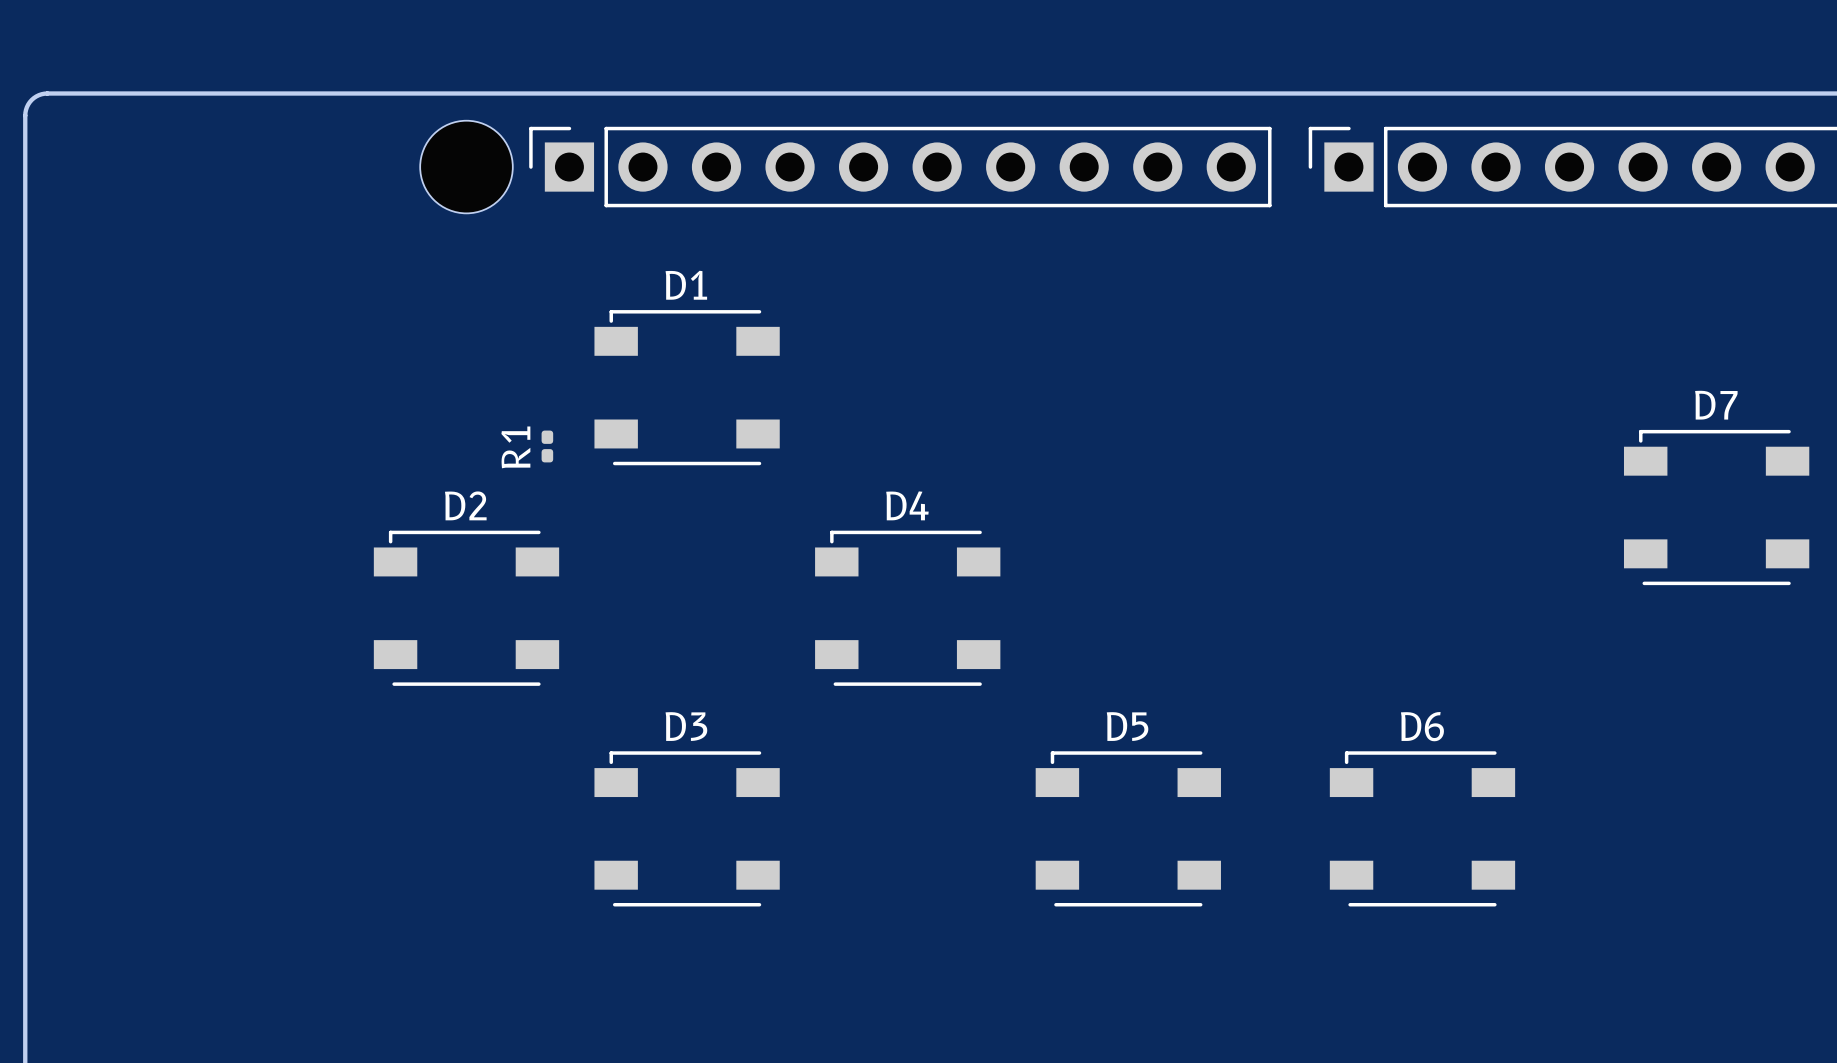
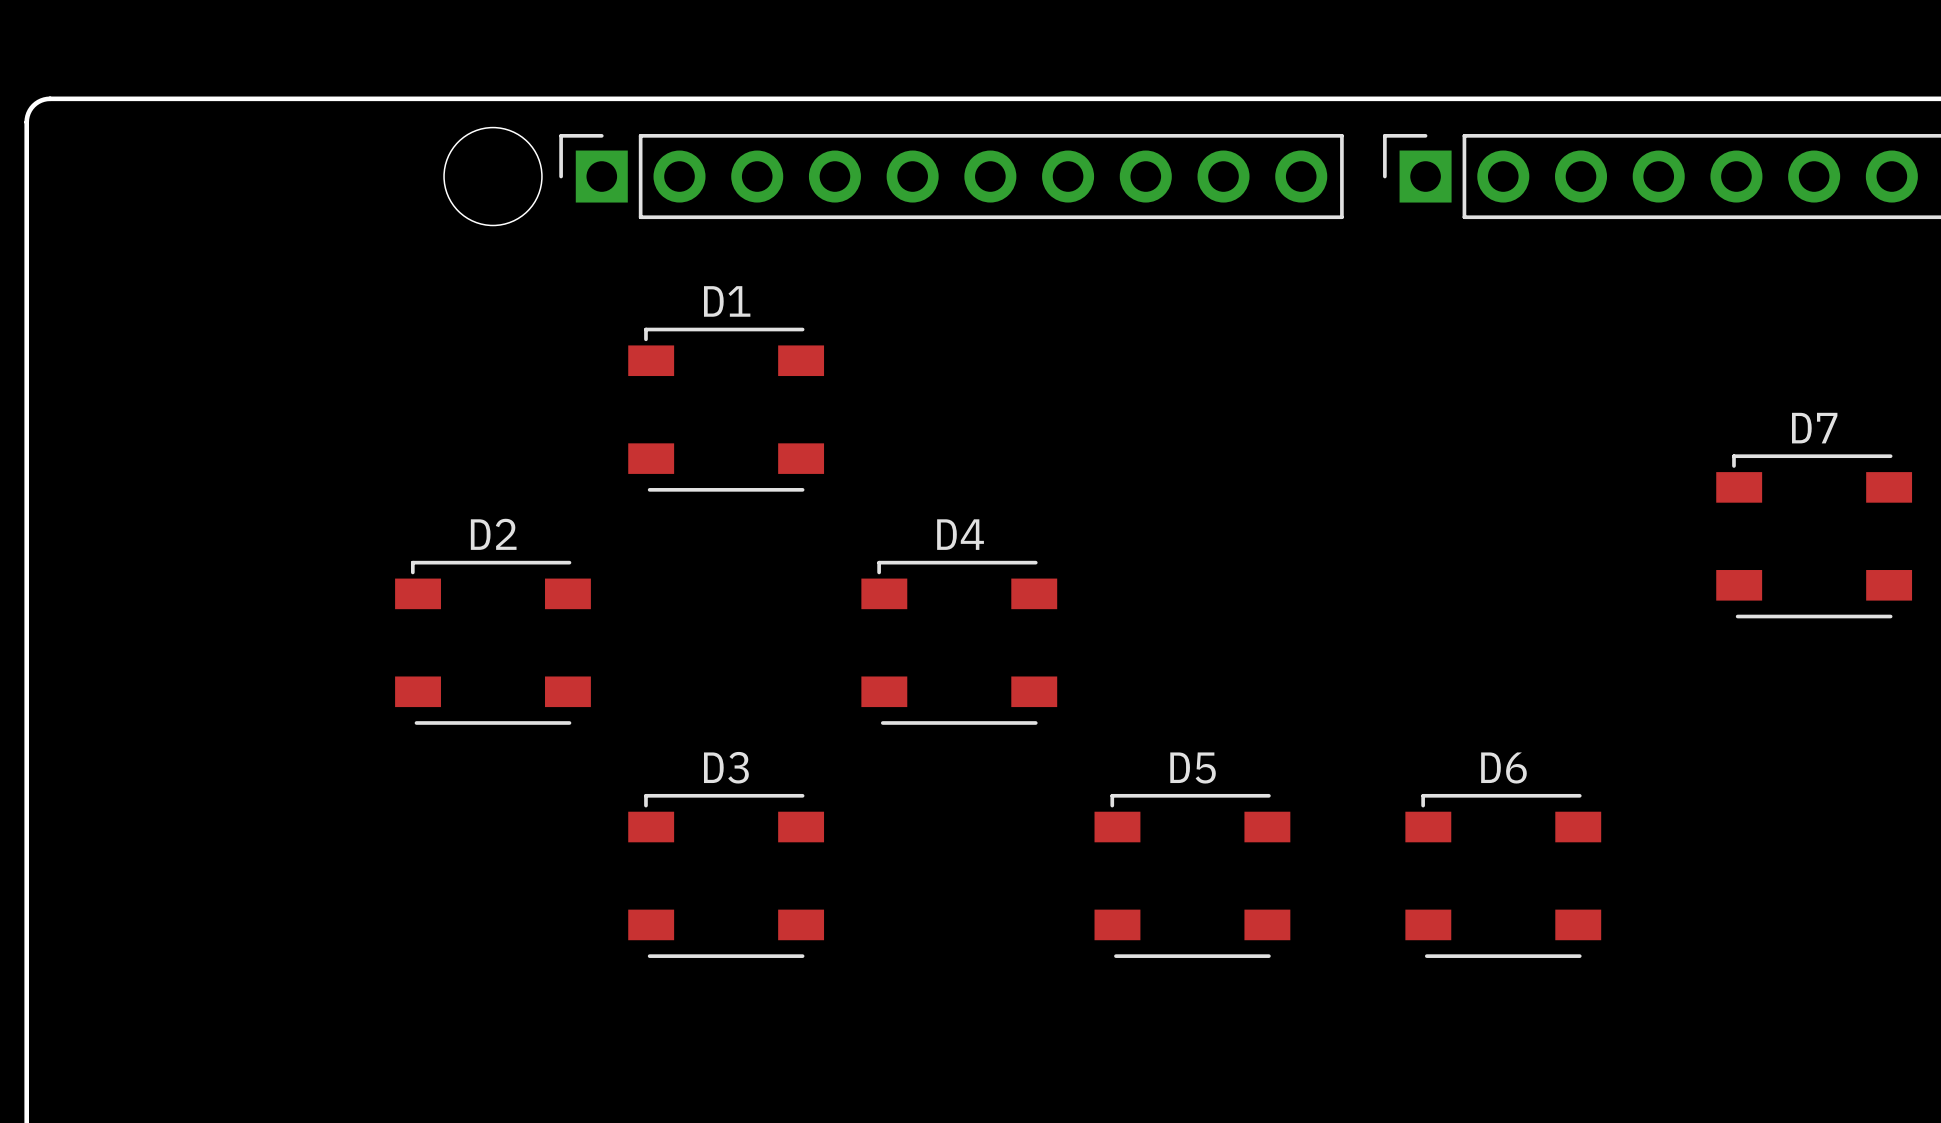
R1: (547, 446) -> none

